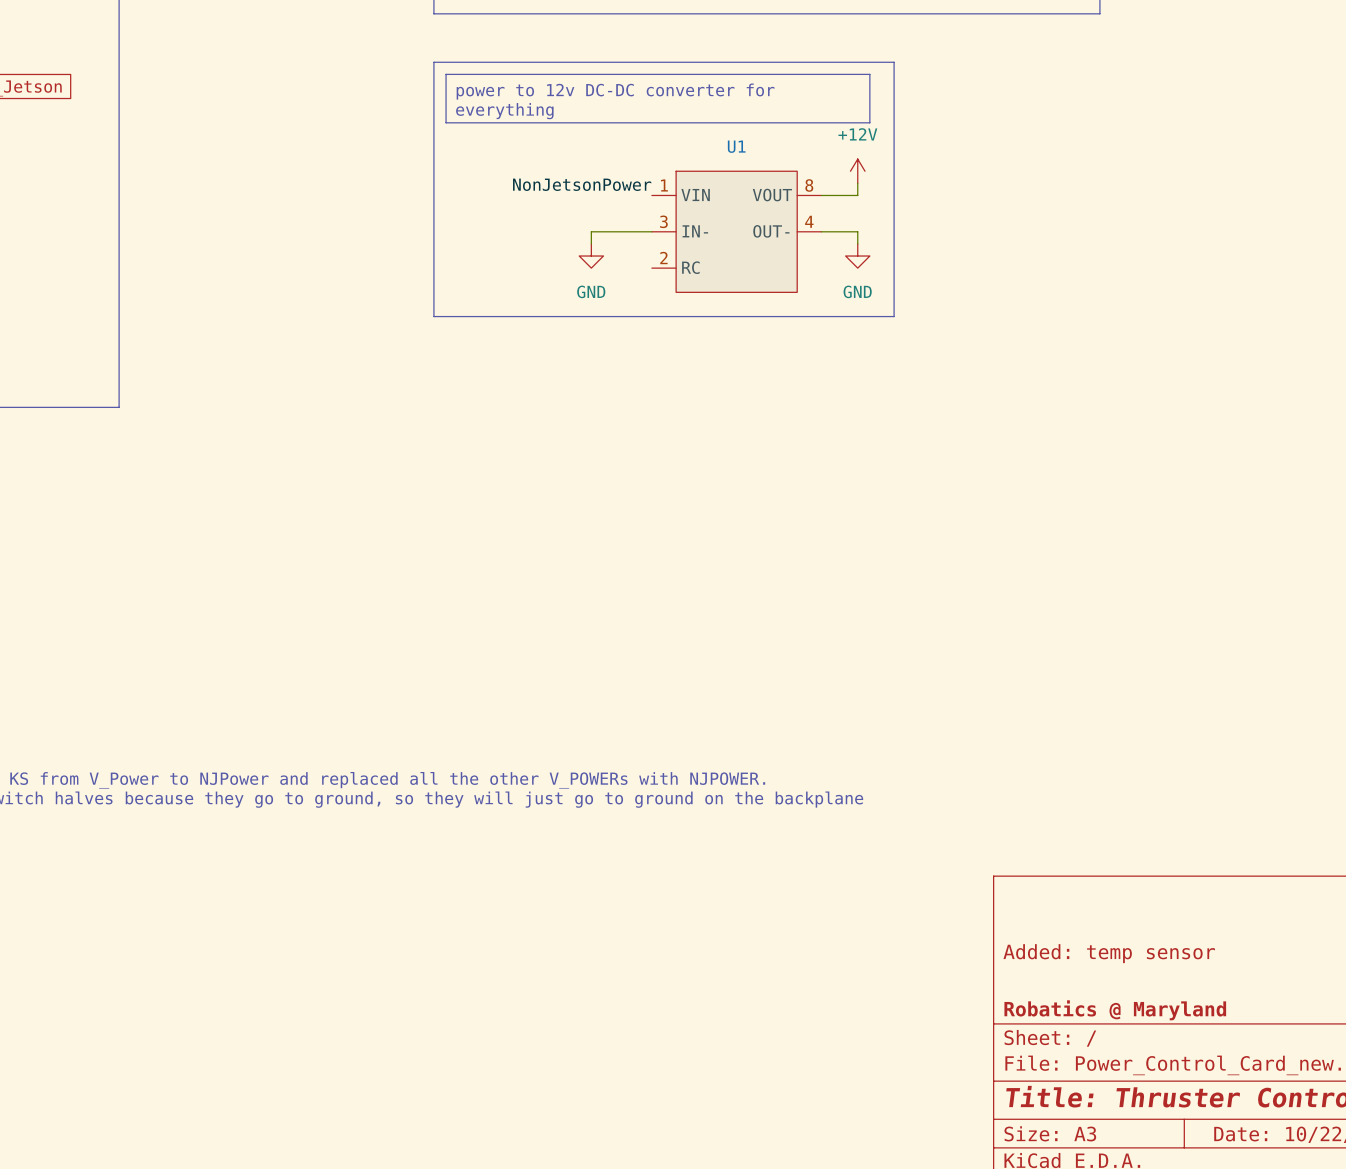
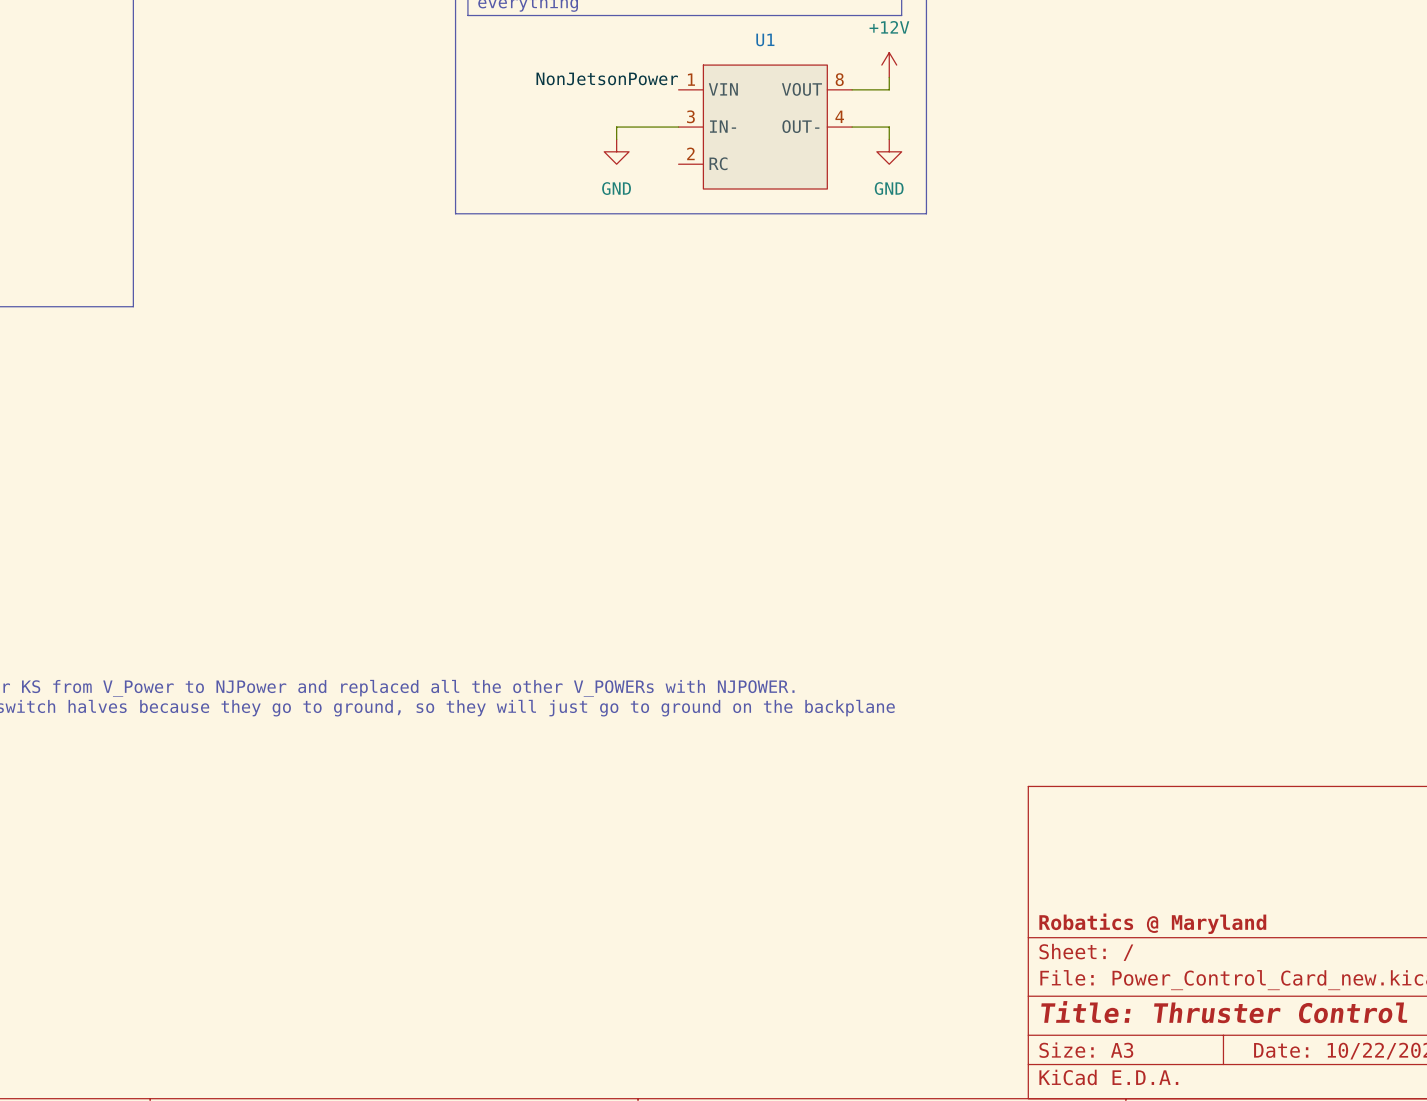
title block: Added: temp sensor (1109, 953) -> none

